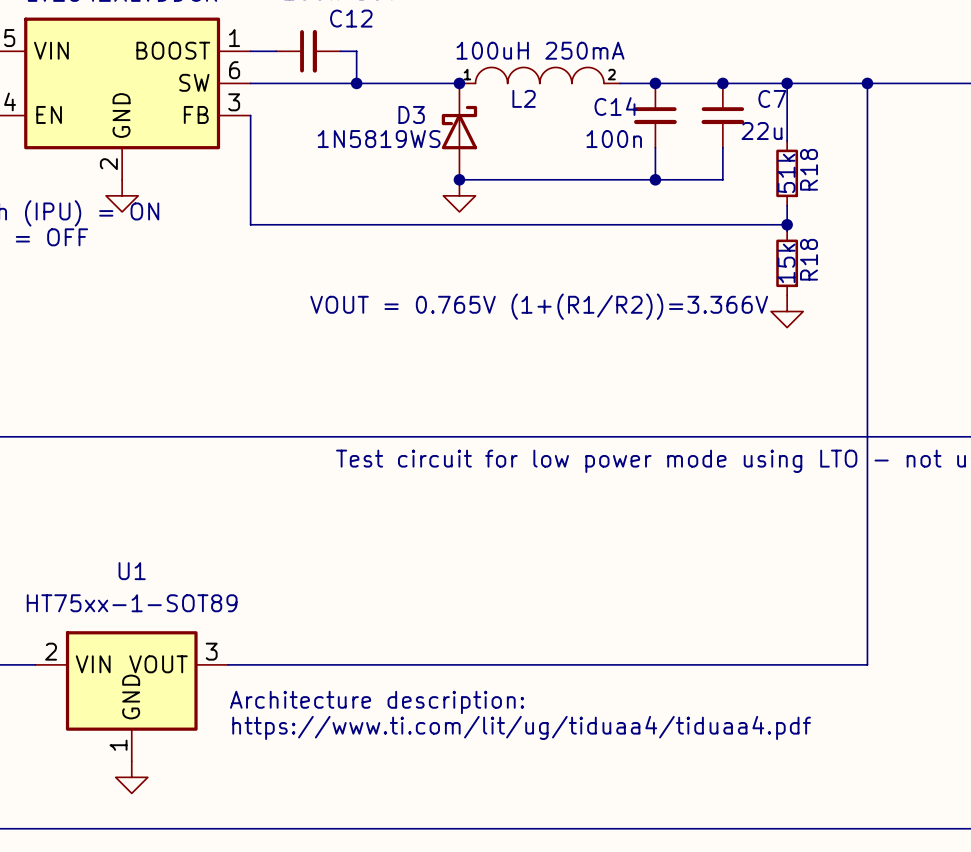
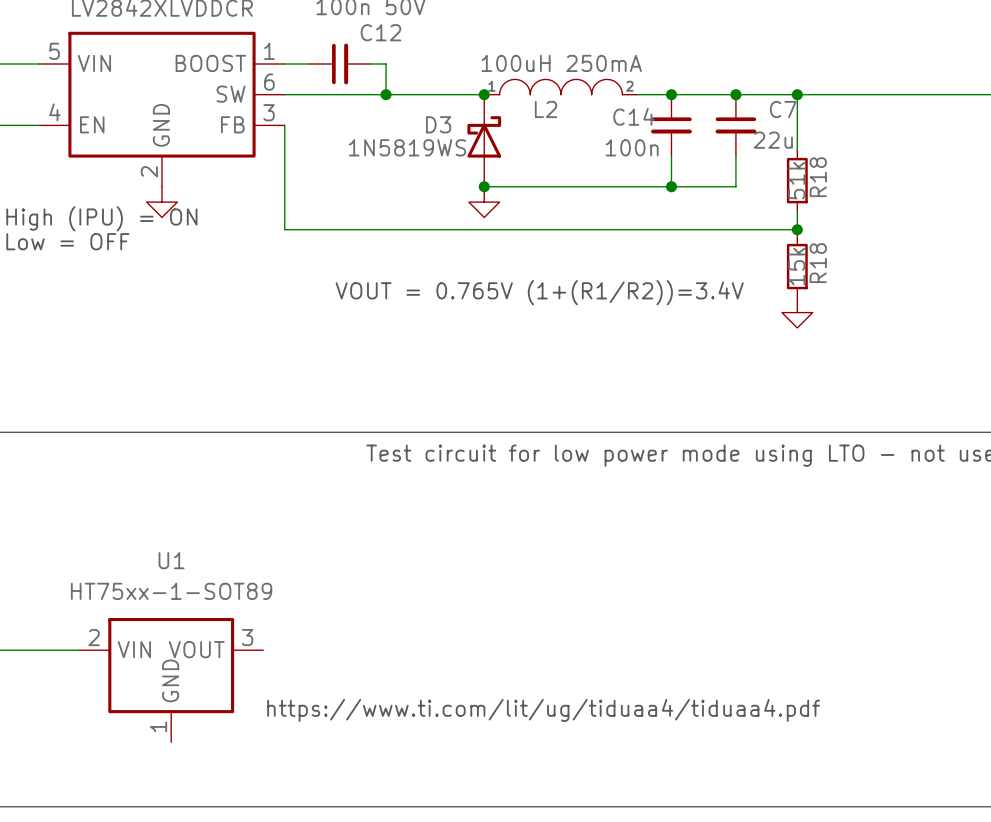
wire: (867, 83) (867, 664) (228, 664) -> none
junction: (867, 83) -> none
text: VOUT = 0.765V (1+(R1/R2))=3.366V (539, 306) -> VOUT = 0.765V (1+(R1/R2))=3.4V (539, 292)
text: Architecture description: (377, 702) -> none
power symbol: (131, 777) -> none

